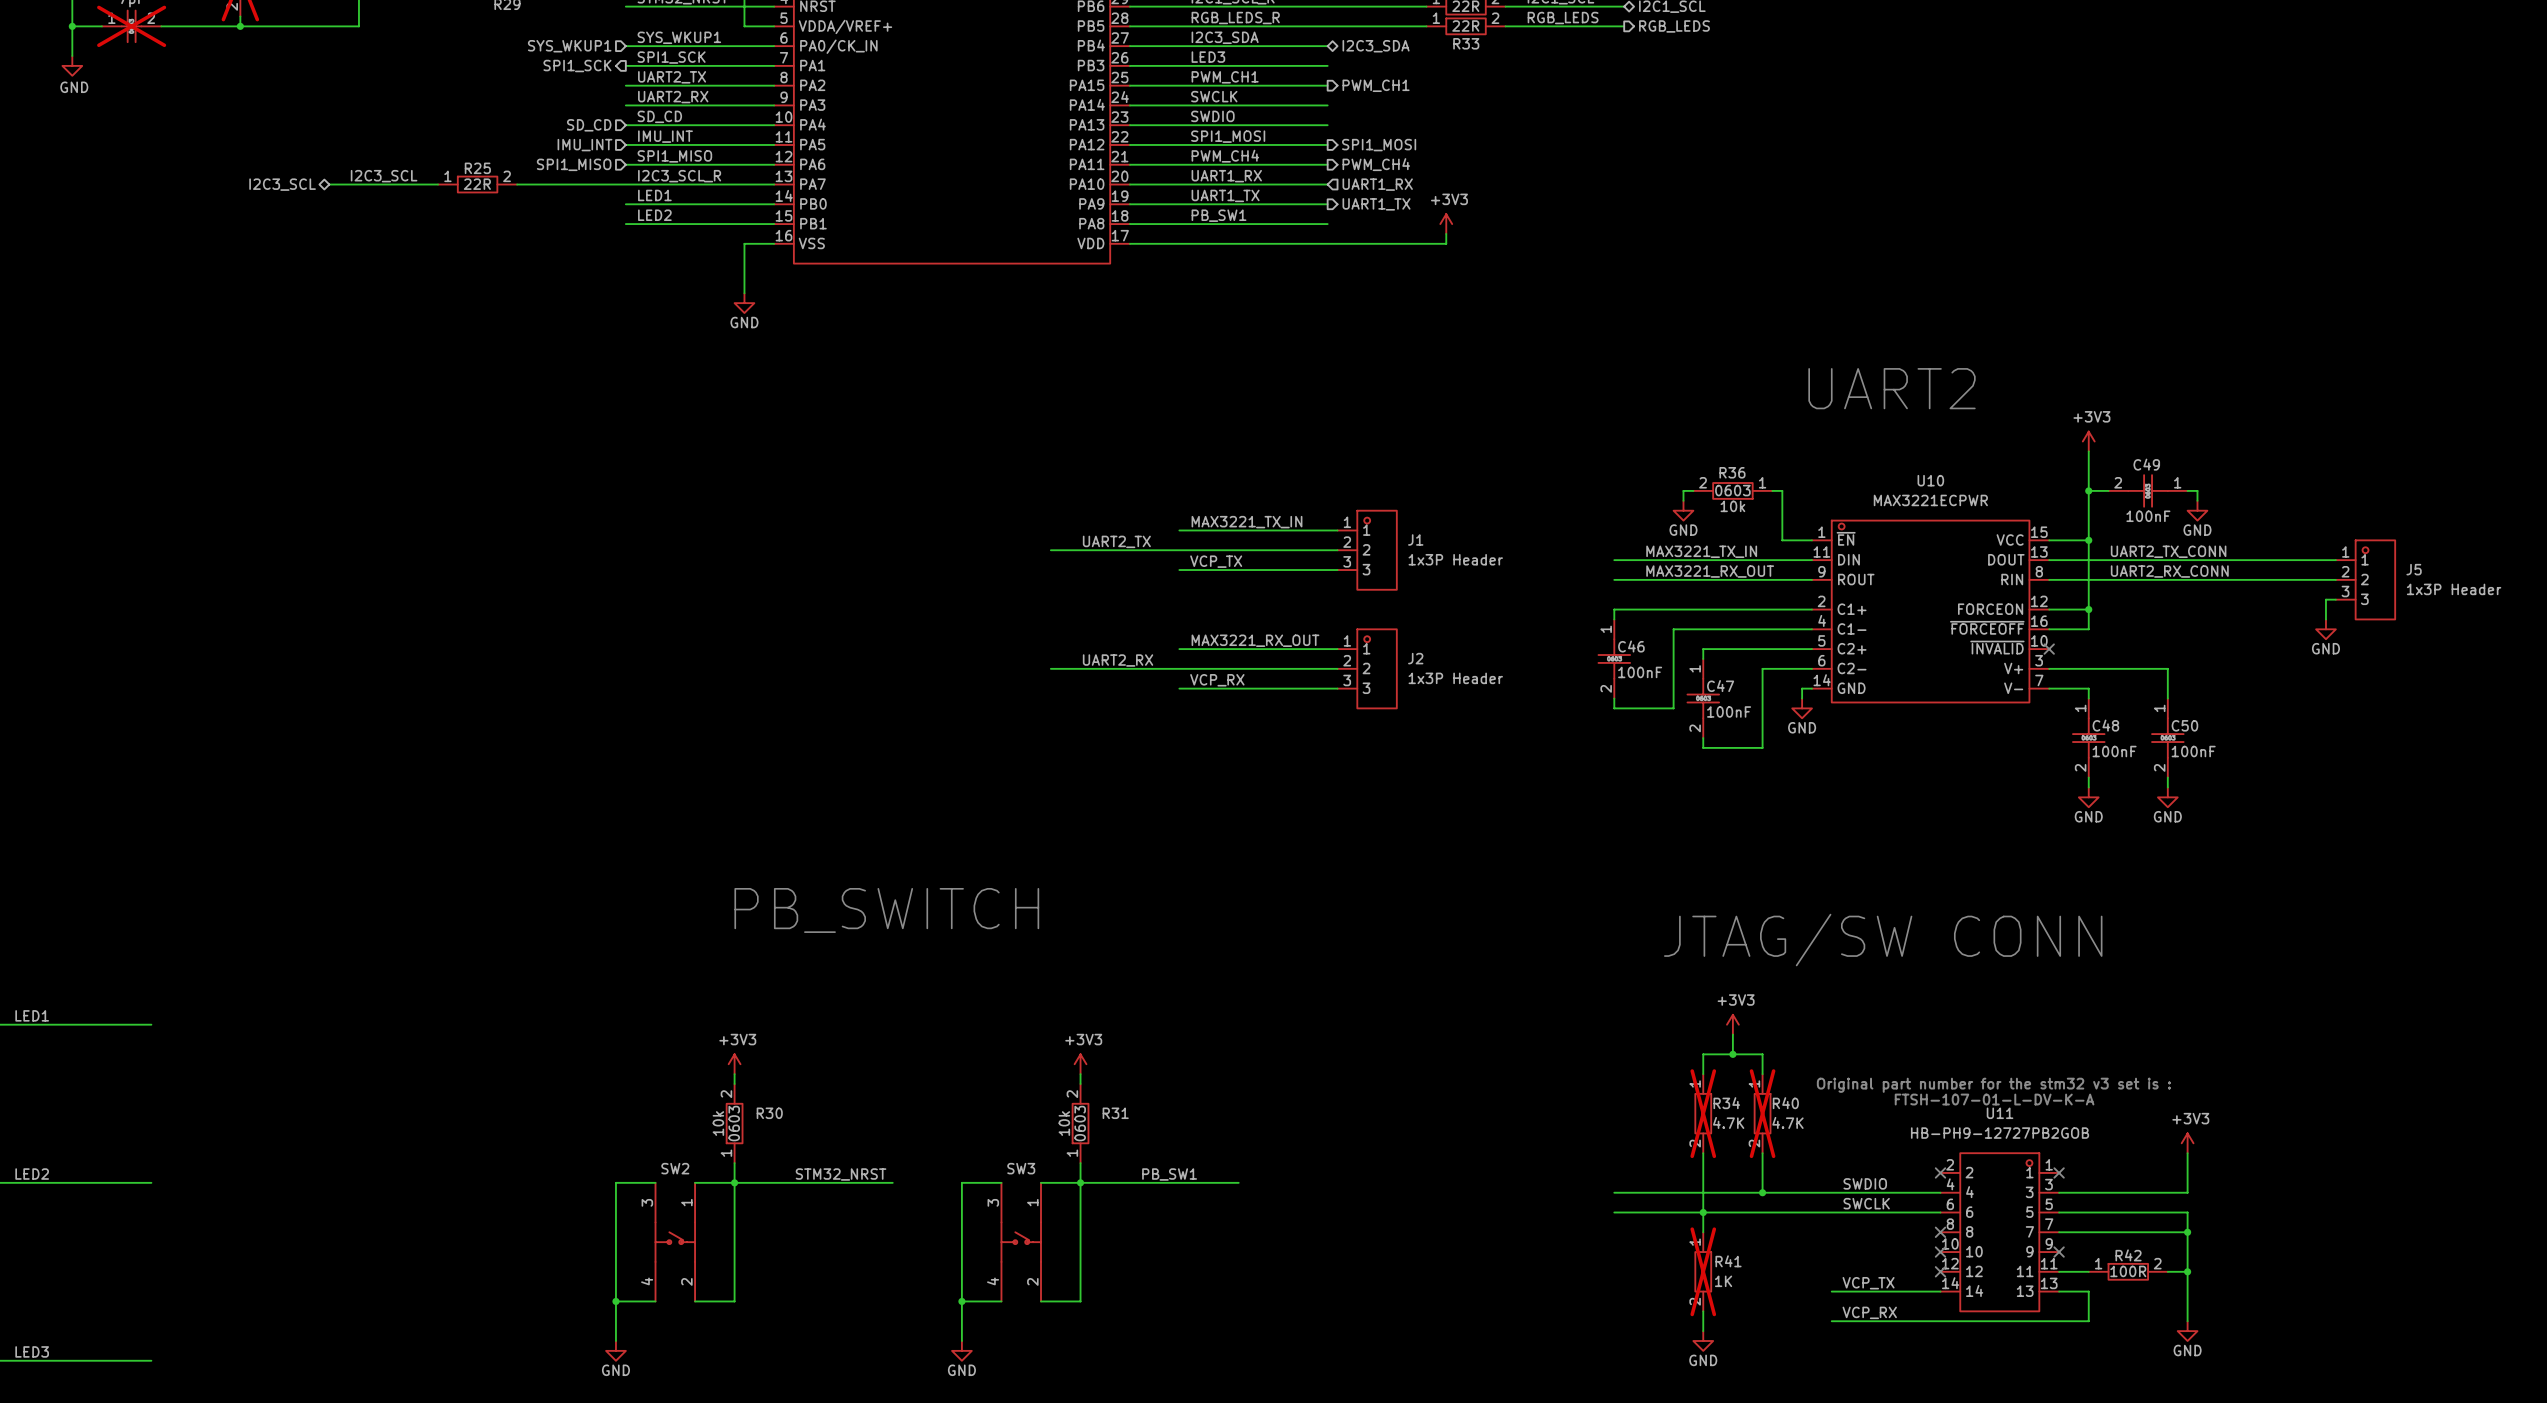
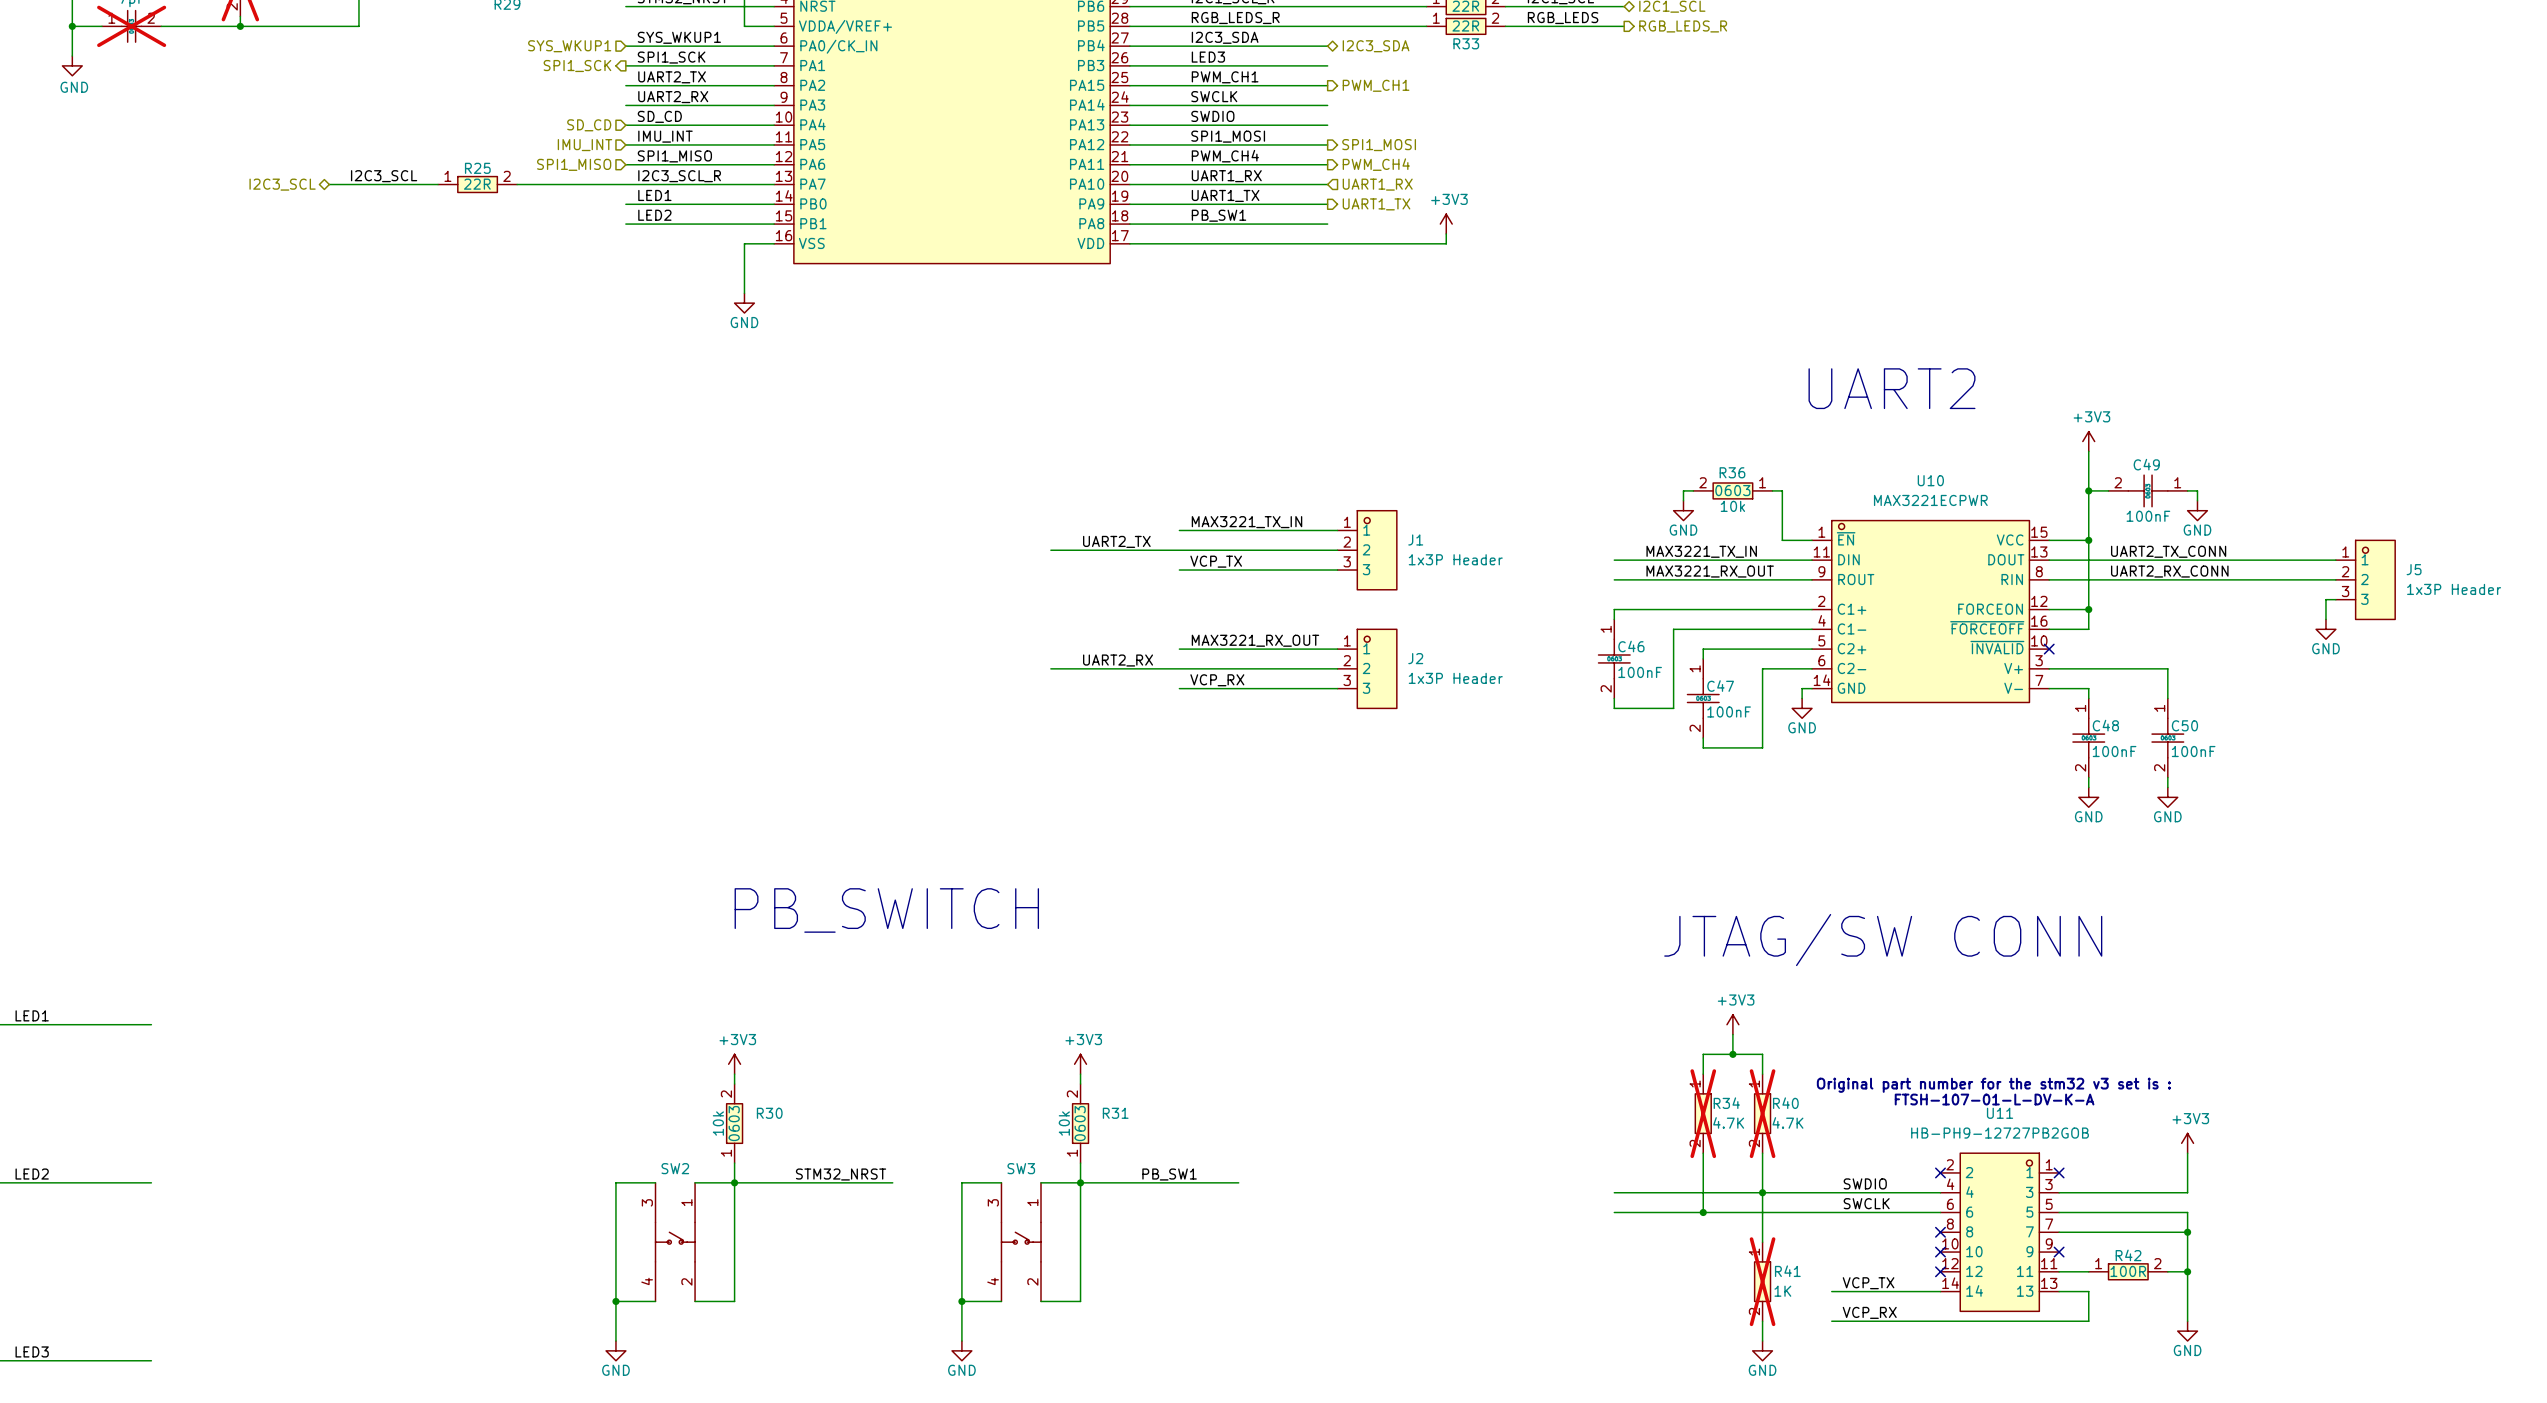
hierarchical label: RGB_LEDS (1674, 26) -> RGB_LEDS_R (1683, 26)
wire: none -> (1762, 1192) (1762, 1242)
wire: (1703, 1212) (1703, 1232) -> none
R41 position: (1703, 1271) -> (1762, 1281)
wire: (1703, 1311) (1703, 1331) -> (1762, 1321) (1762, 1341)
power symbol position: GND (1703, 1341) -> GND (1762, 1350)

